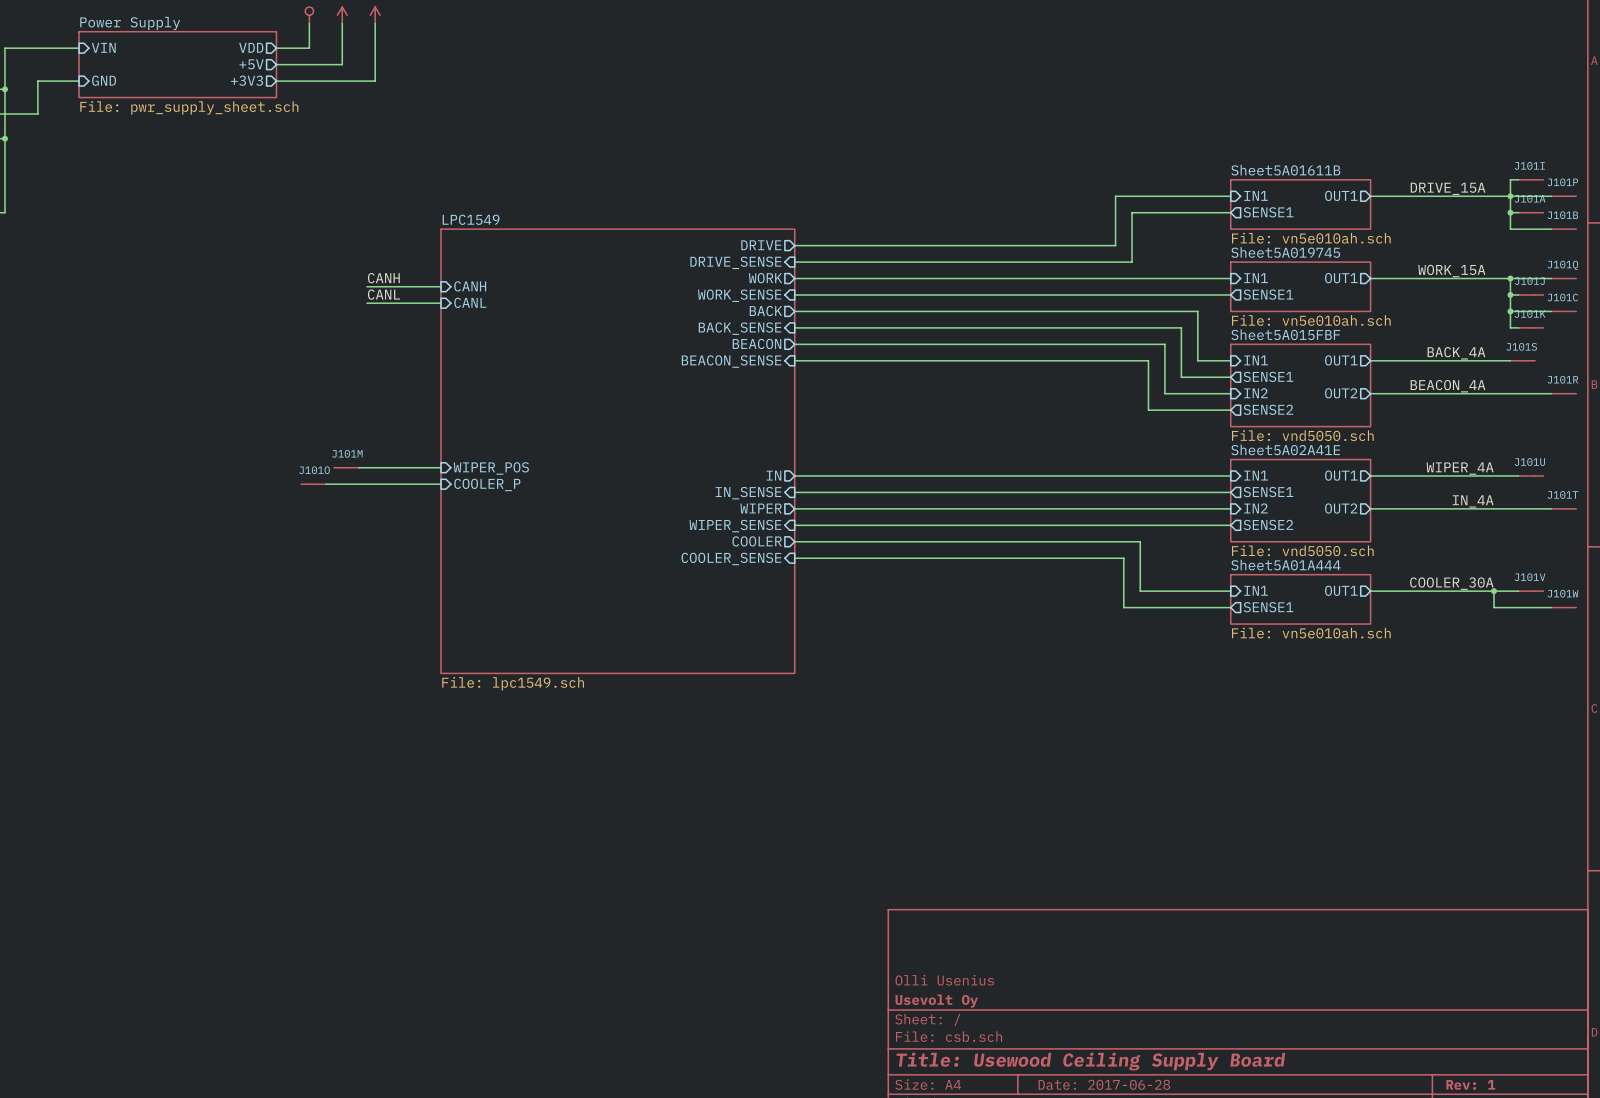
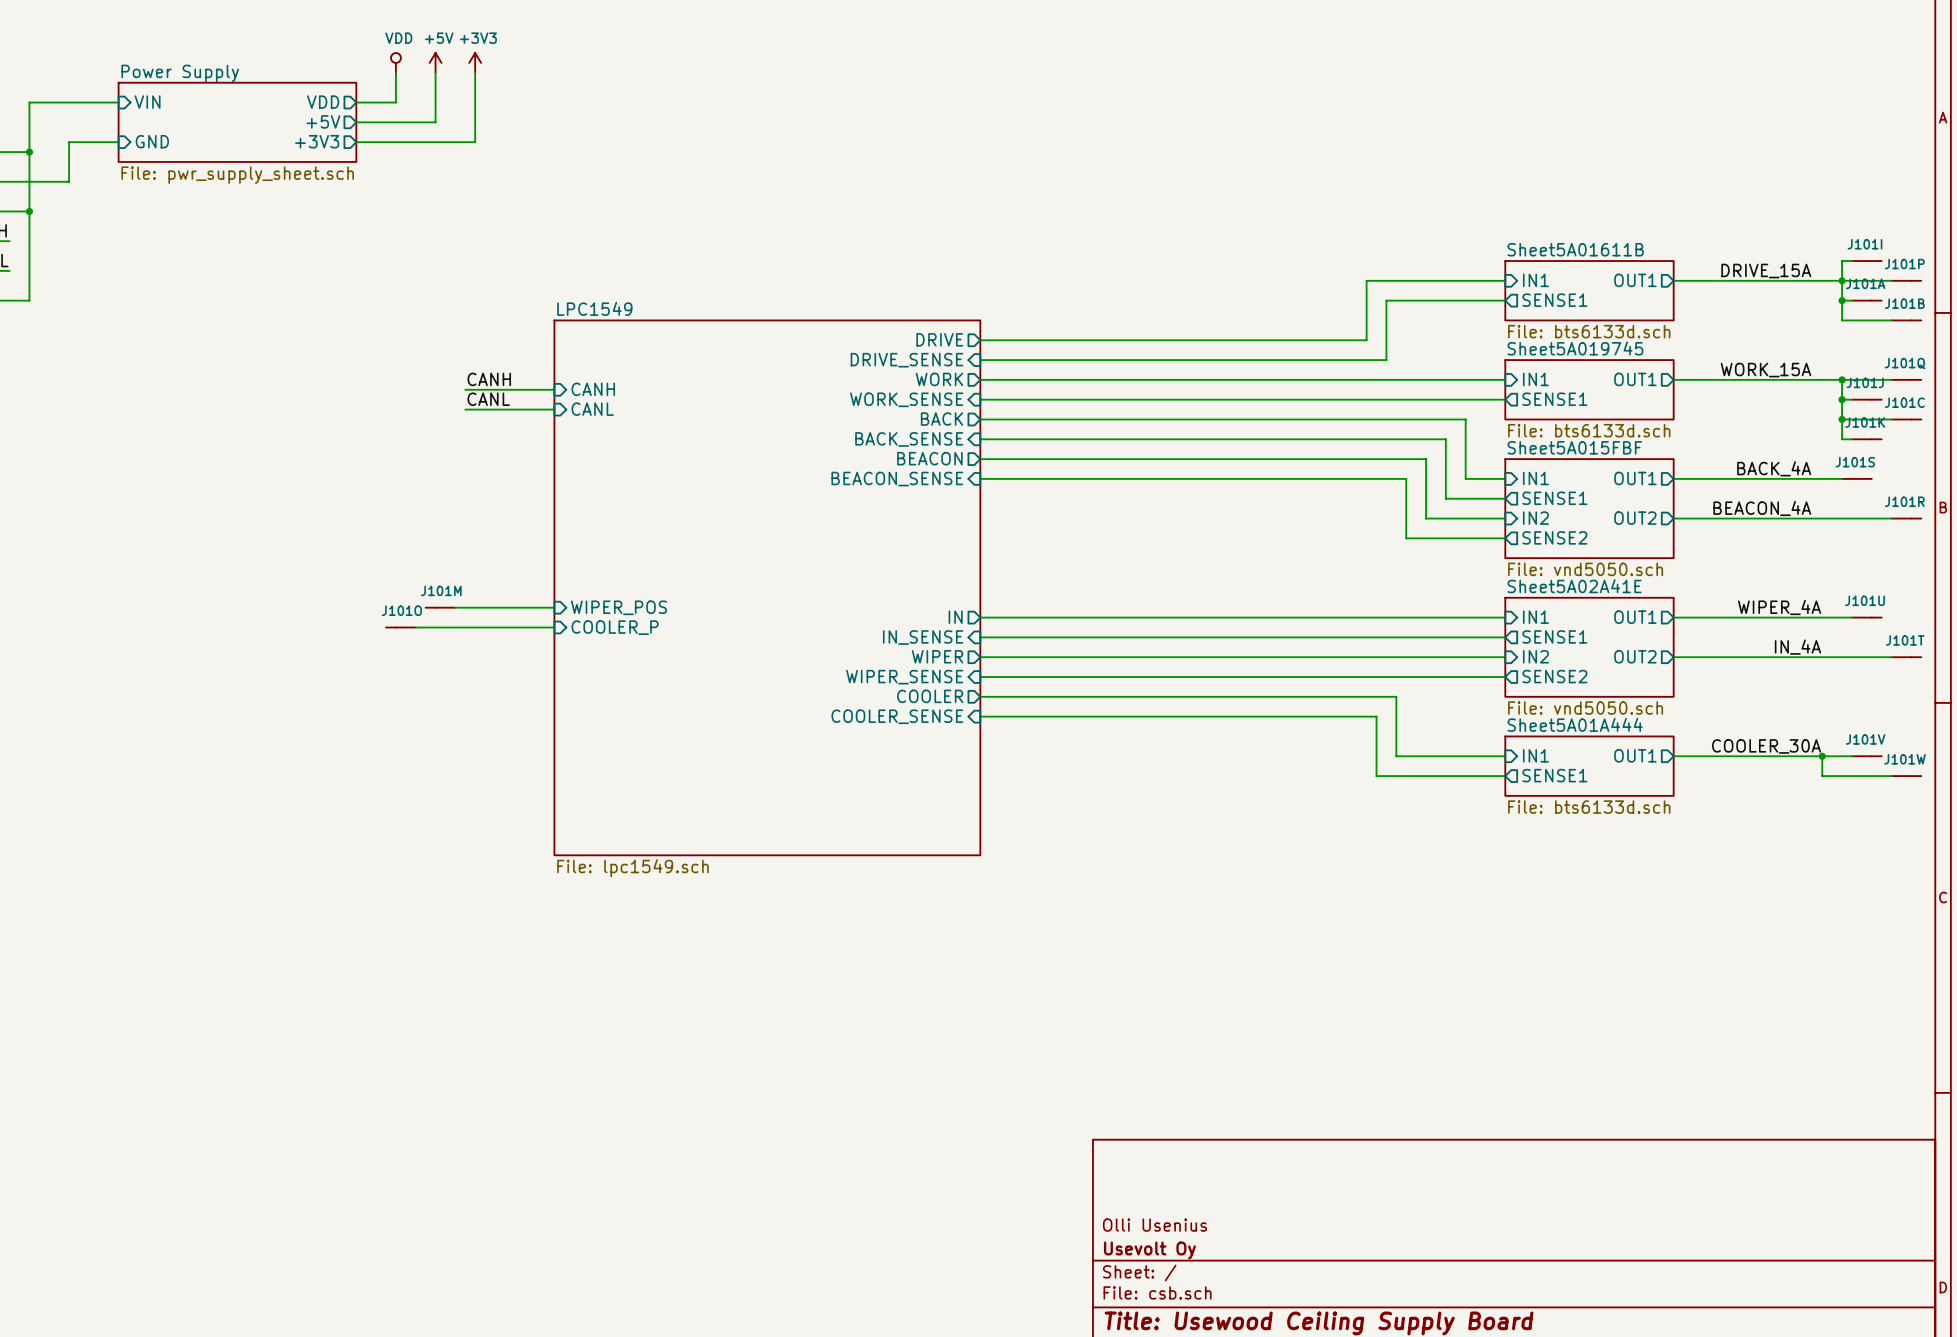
sheet Sheet5A01611B value: File: vn5e010ah.sch (1311, 238) -> File: bts6133d.sch (1589, 331)
sheet Sheet5A019745 value: File: vn5e010ah.sch (1311, 320) -> File: bts6133d.sch (1589, 430)
sheet Sheet5A01A444 value: File: vn5e010ah.sch (1311, 633) -> File: bts6133d.sch (1589, 807)

